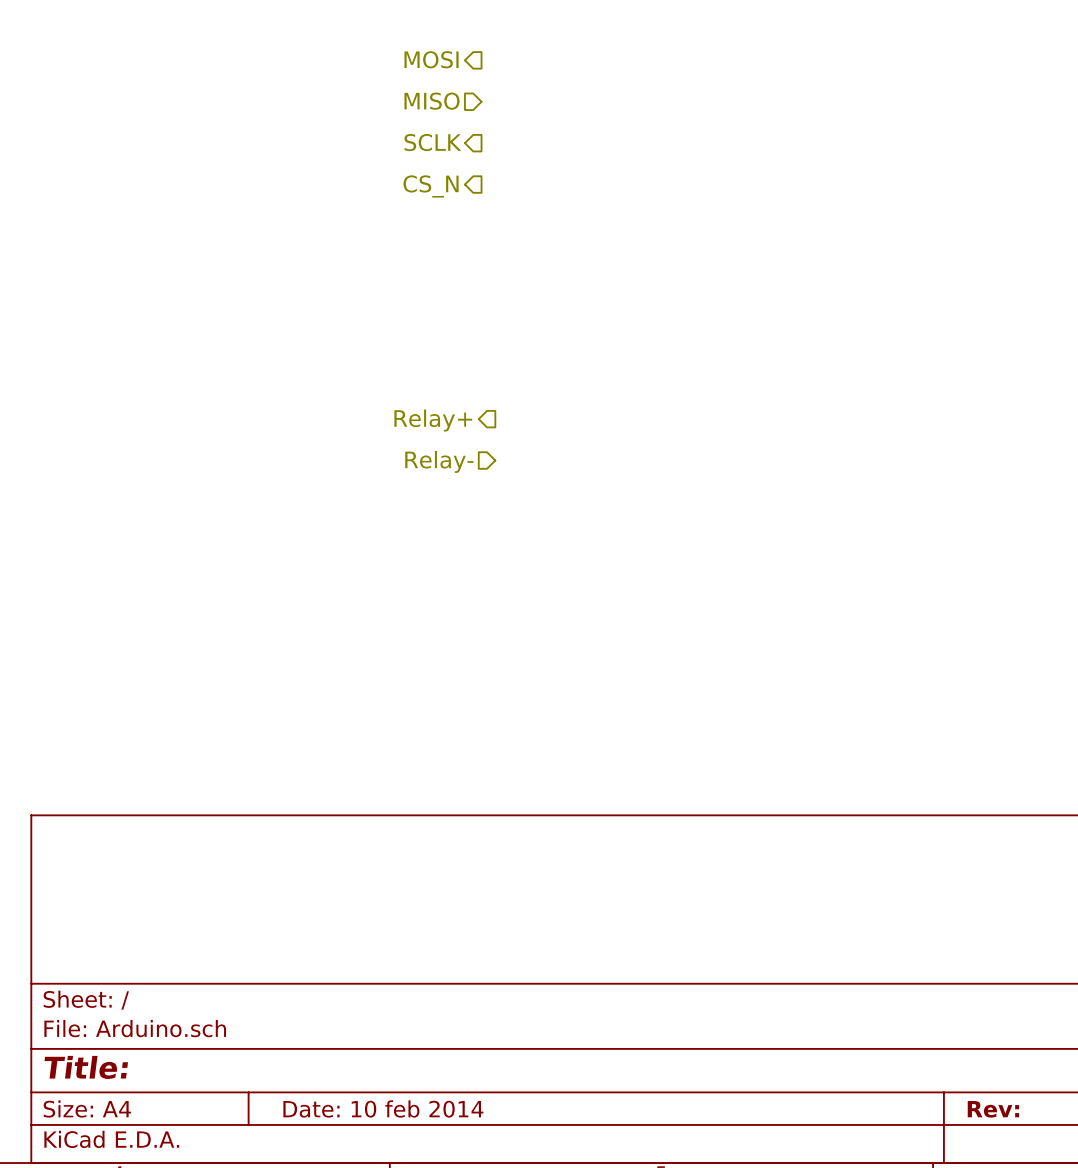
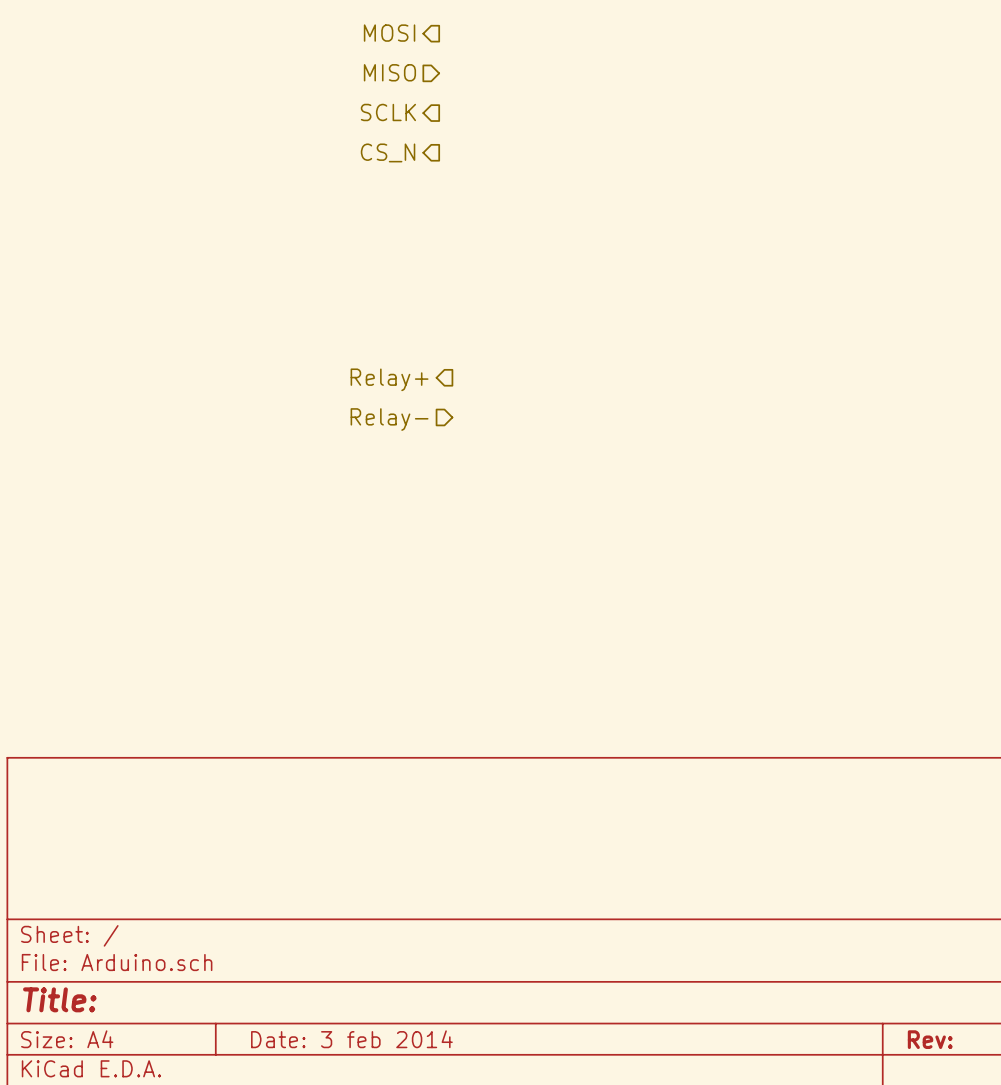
title block: Date: 10 feb 2014 (383, 1108) -> Date: 3 feb 2014 (351, 1039)

